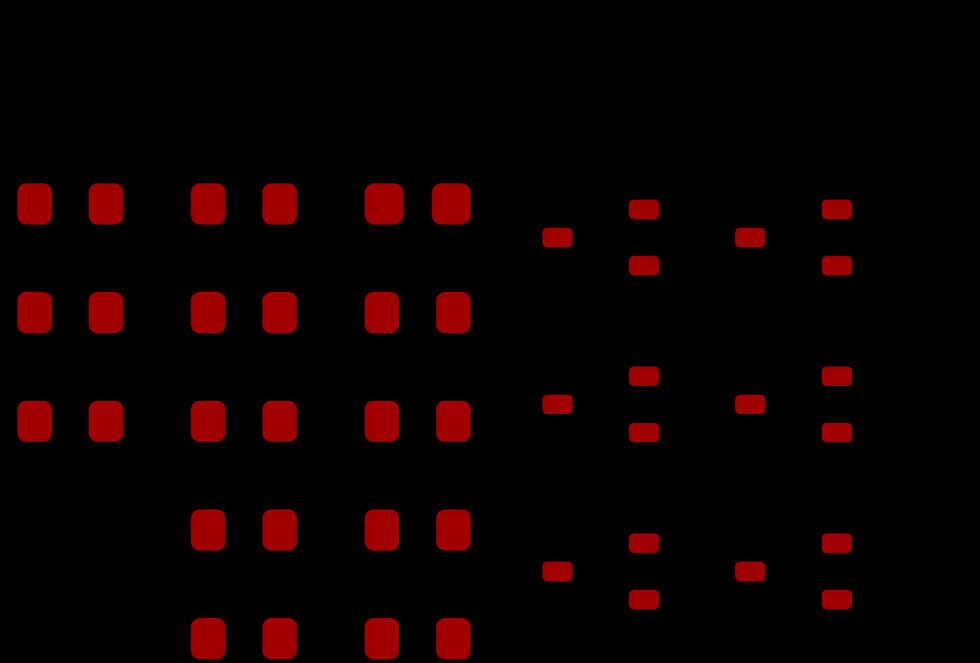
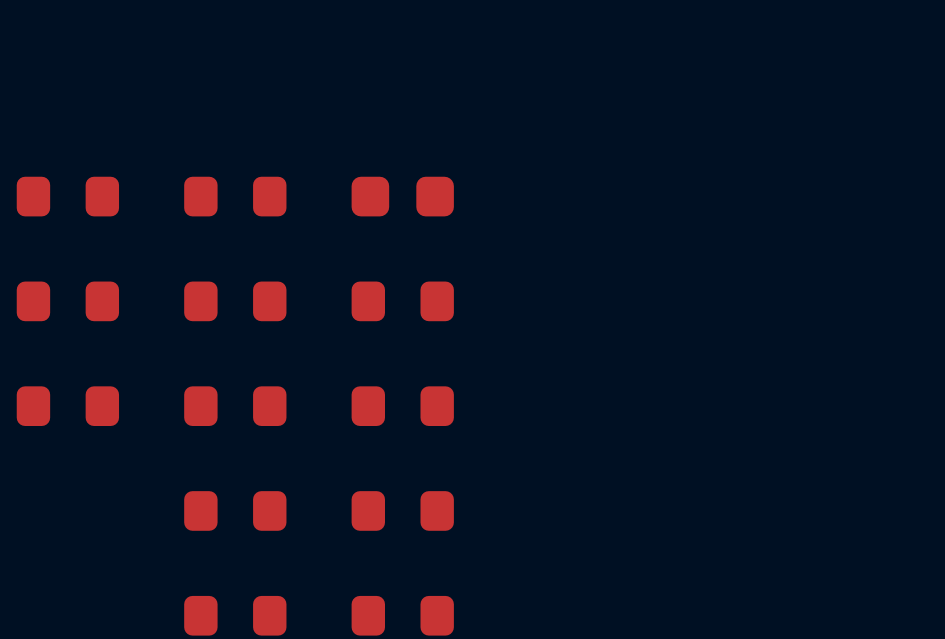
part: (600, 237) -> none
part: (793, 237) -> none
part: (600, 404) -> none
part: (793, 404) -> none
part: (600, 571) -> none
part: (793, 571) -> none

